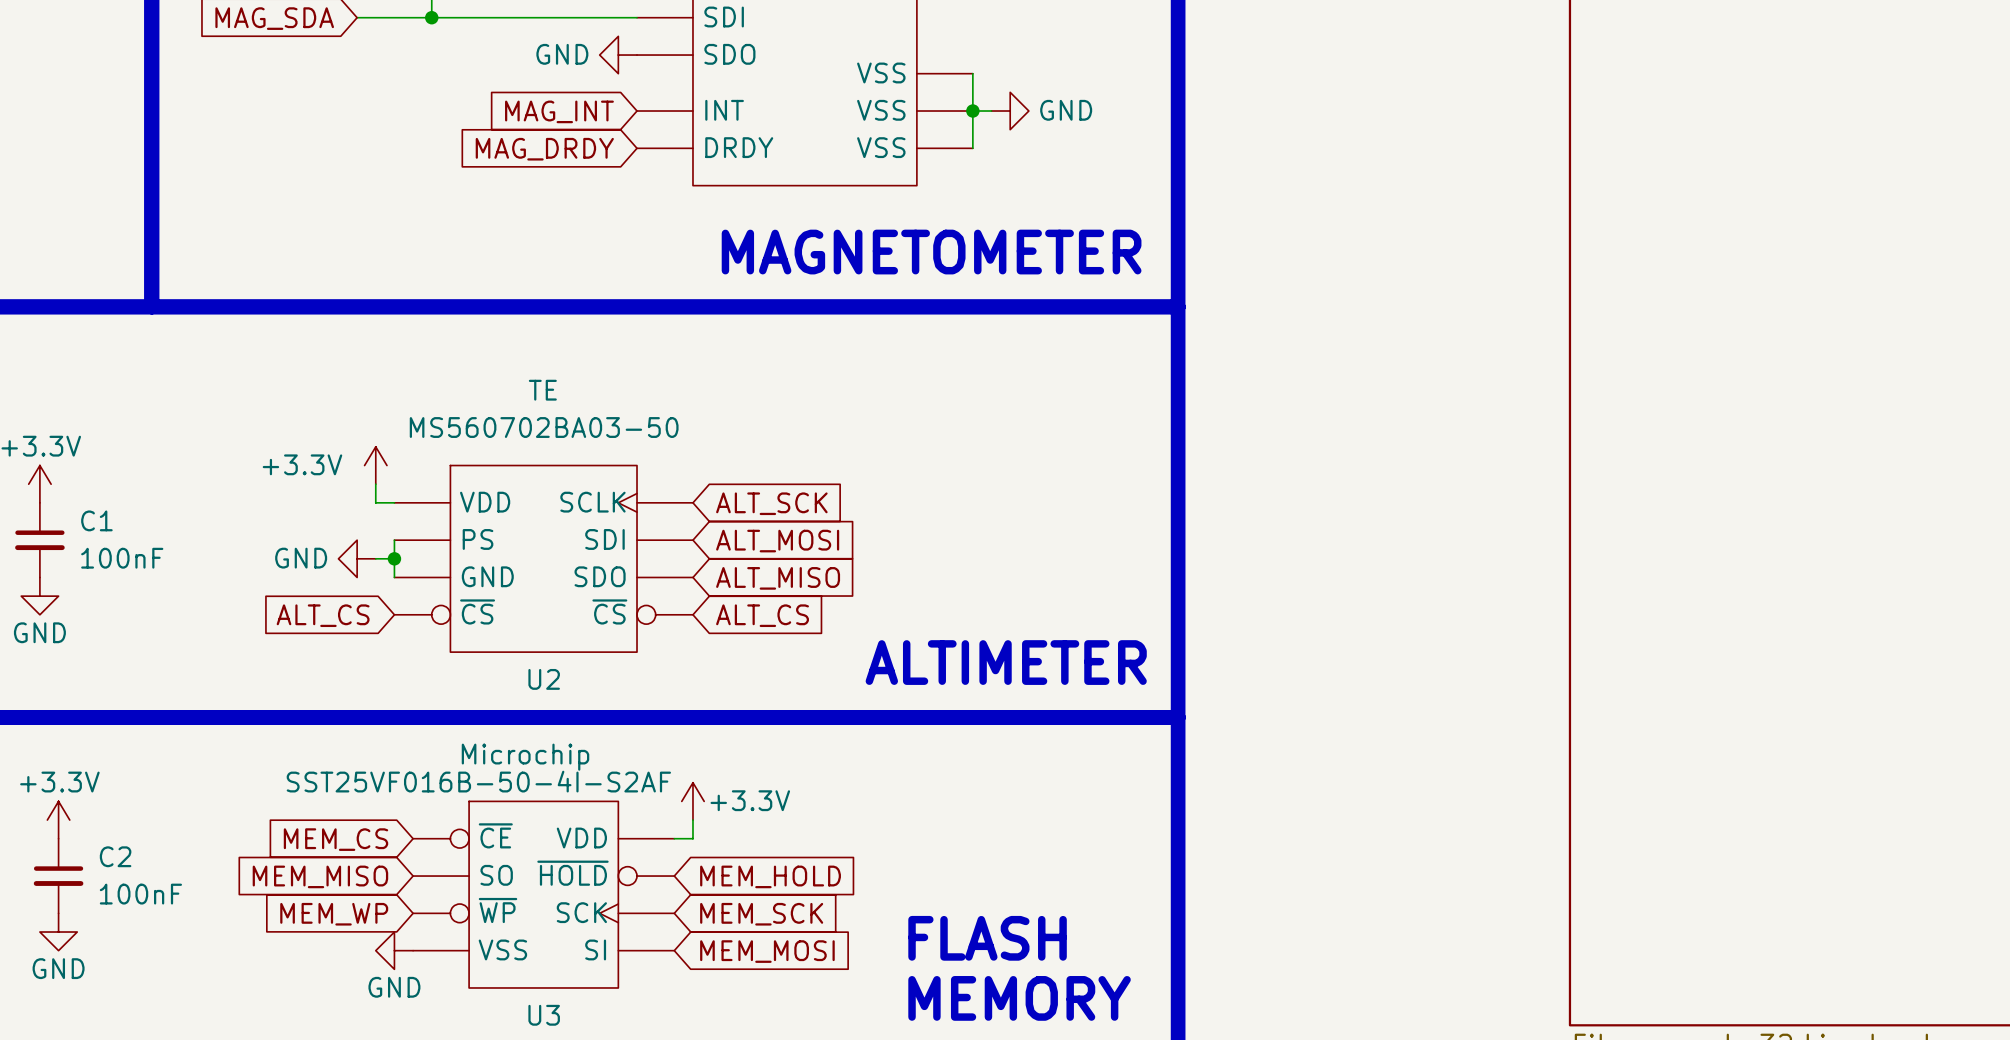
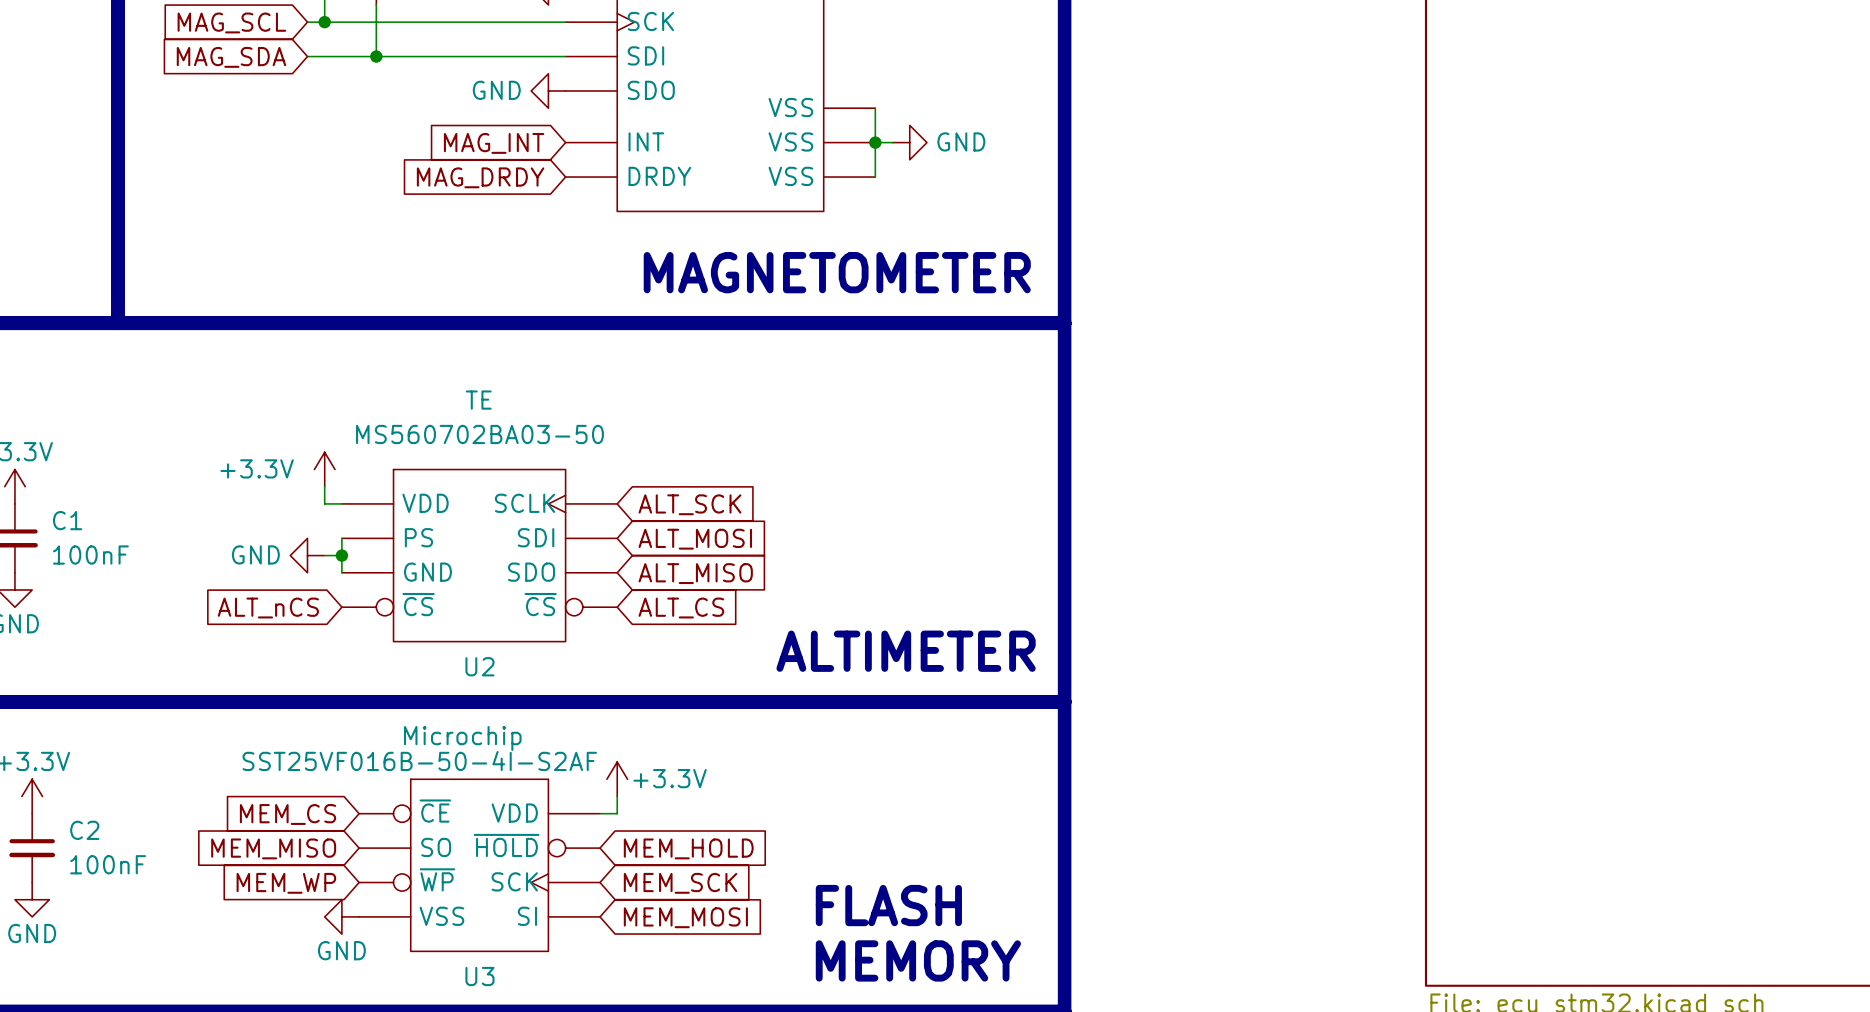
global label: ALT_CS (323, 615) -> ALT_nCS (268, 608)

